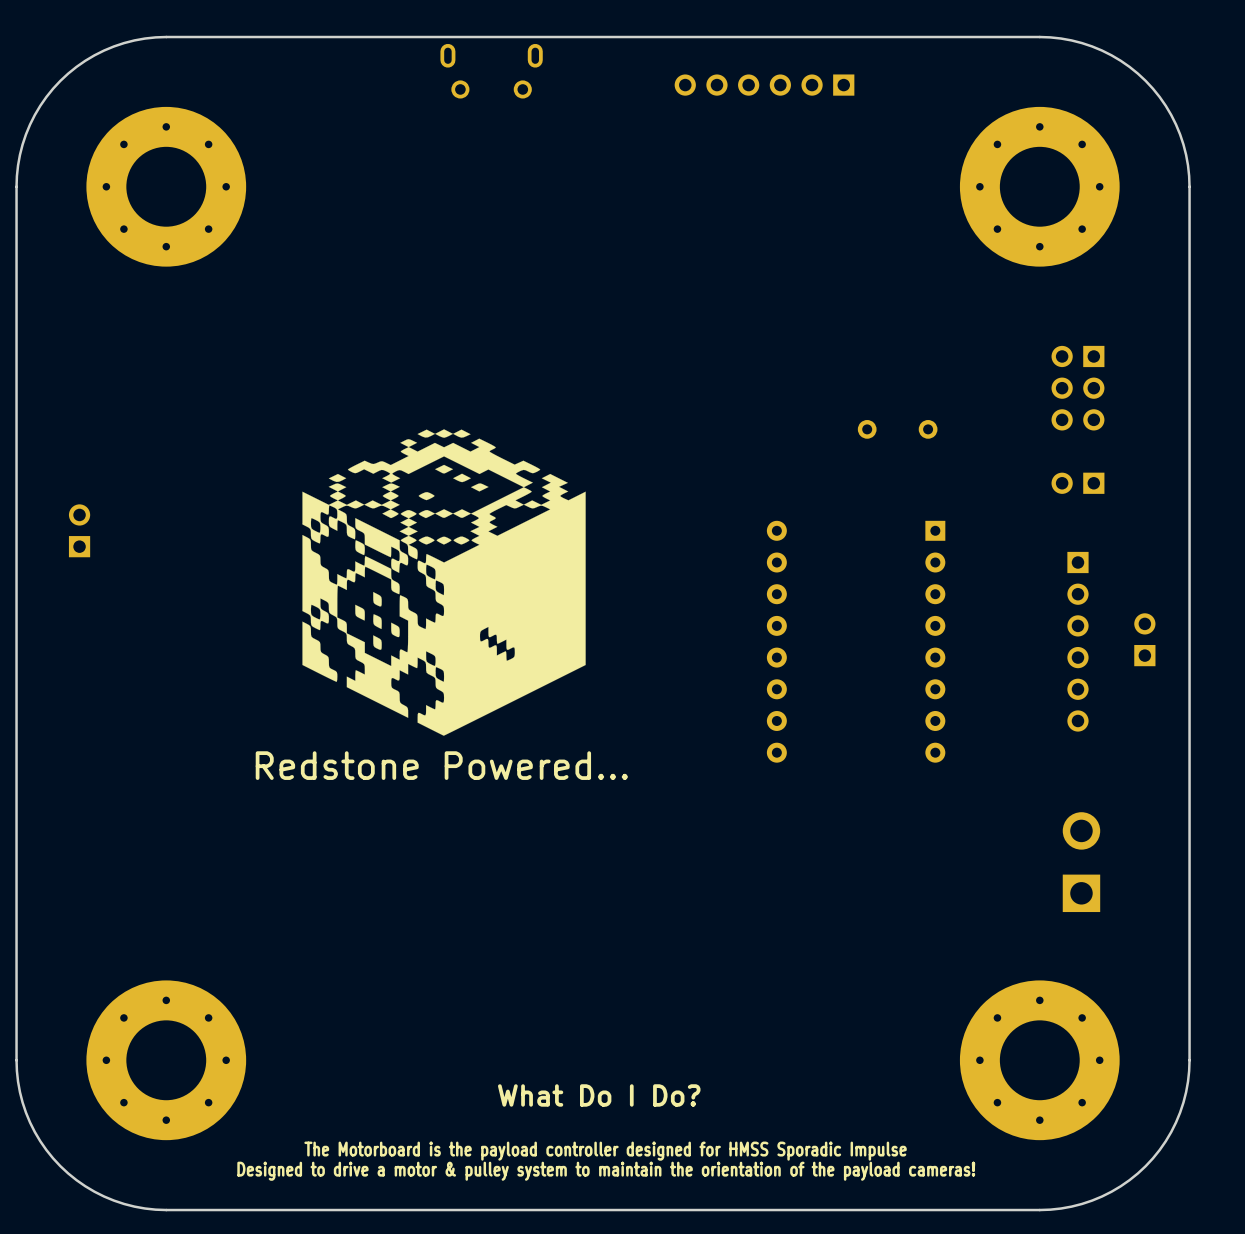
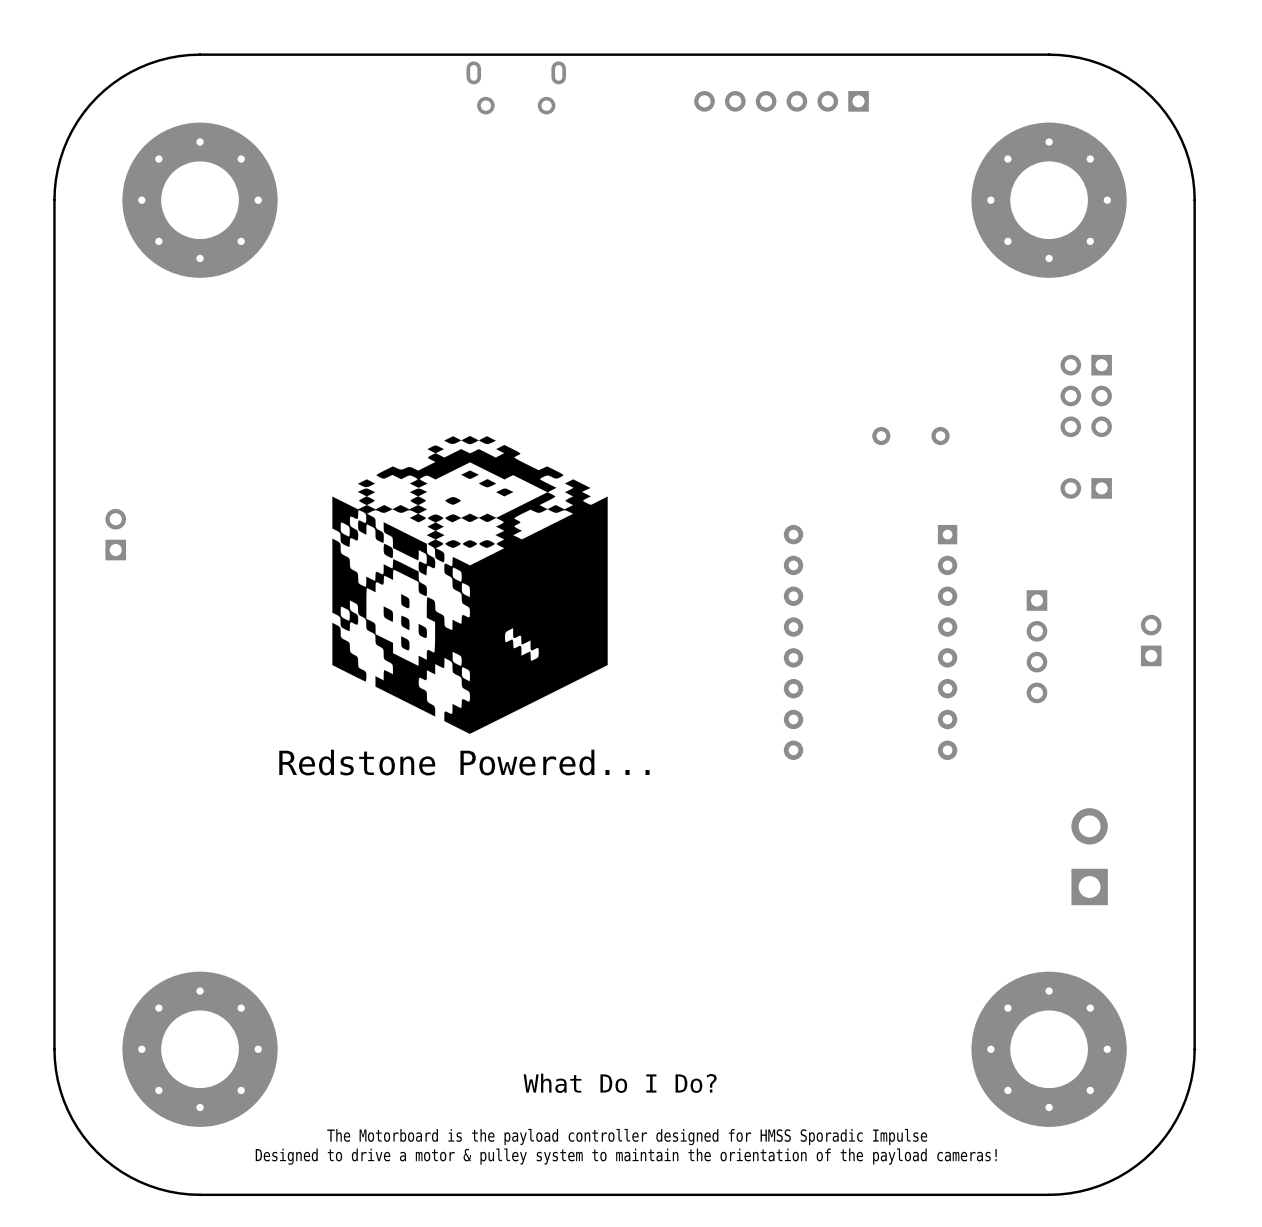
part: (1077, 641) -> none
part: none -> (1036, 646)

